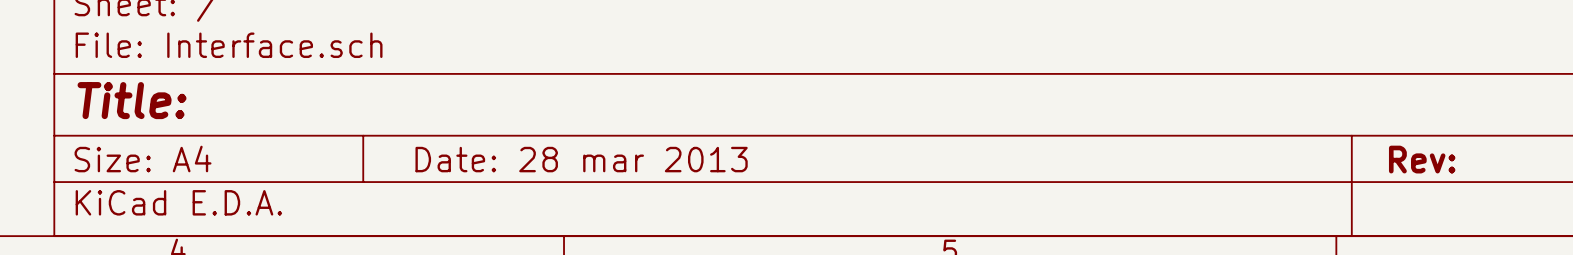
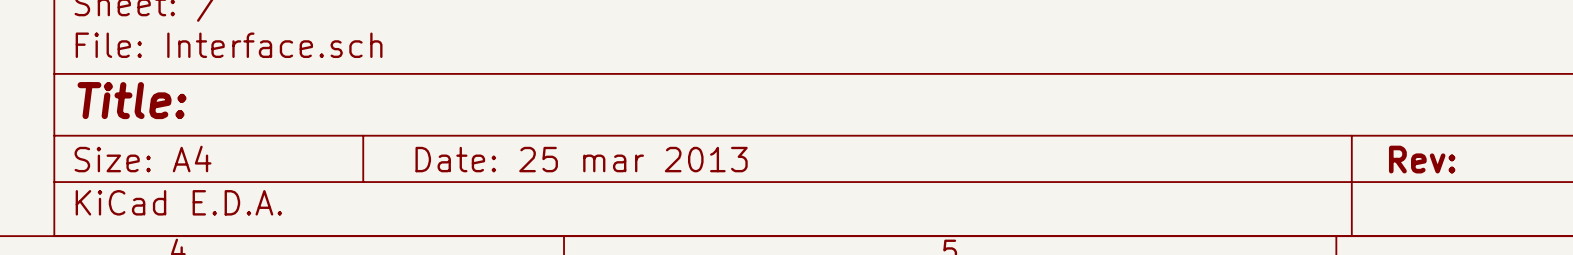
title block: Date: 28 mar 2013 (581, 159) -> Date: 25 mar 2013 (581, 159)

